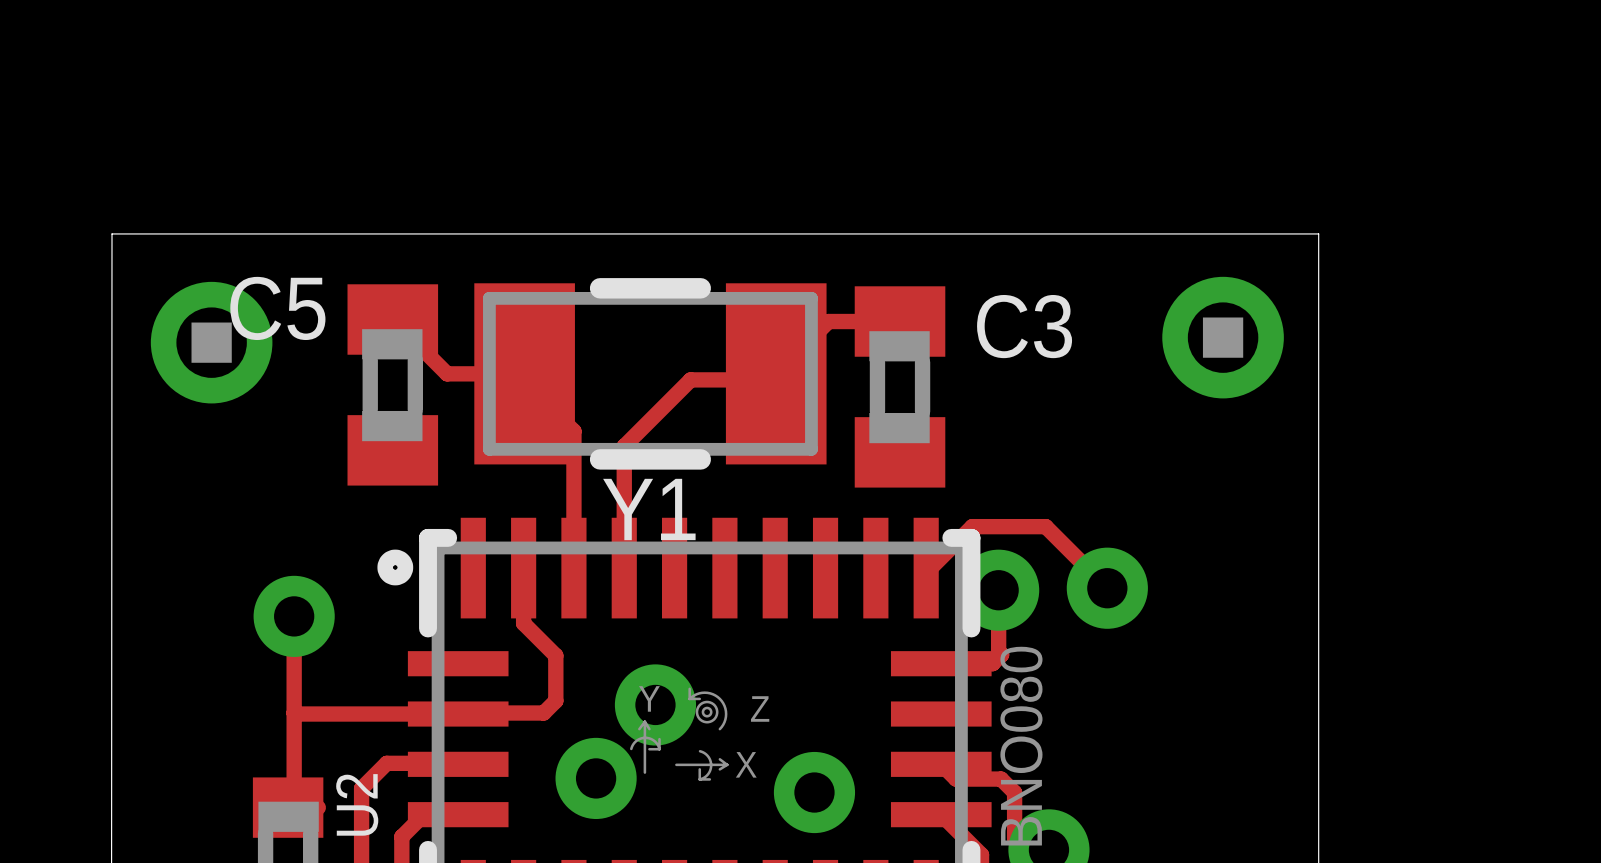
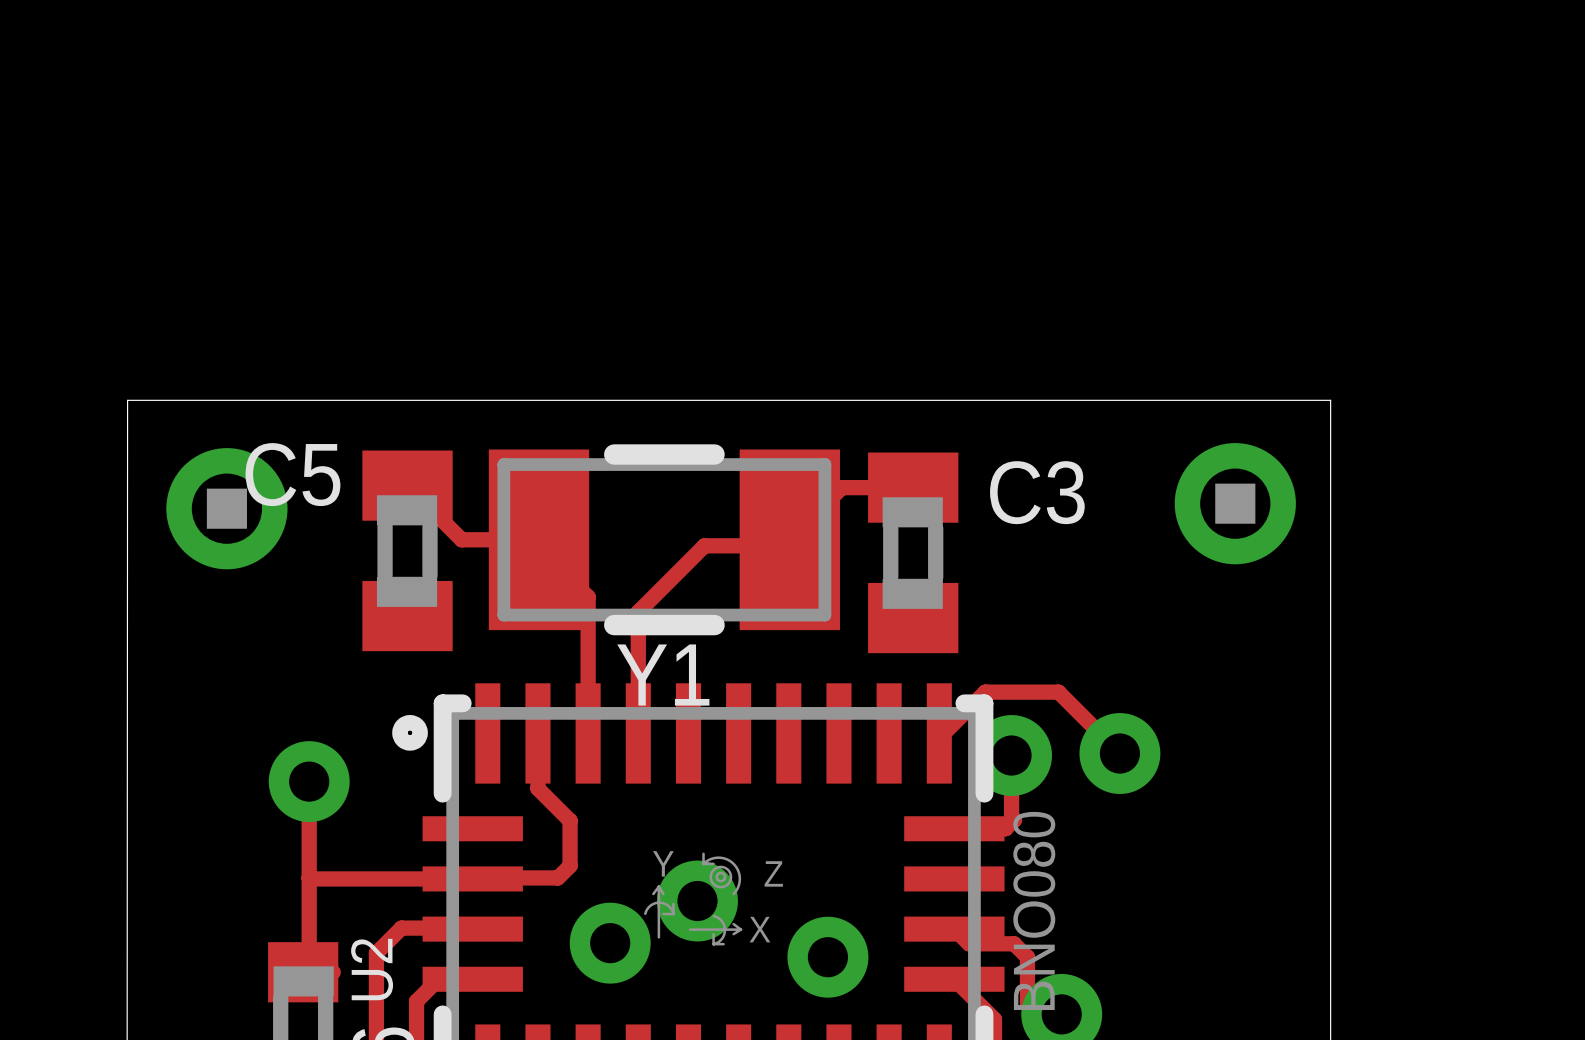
via position: (655, 704) -> (697, 901)

